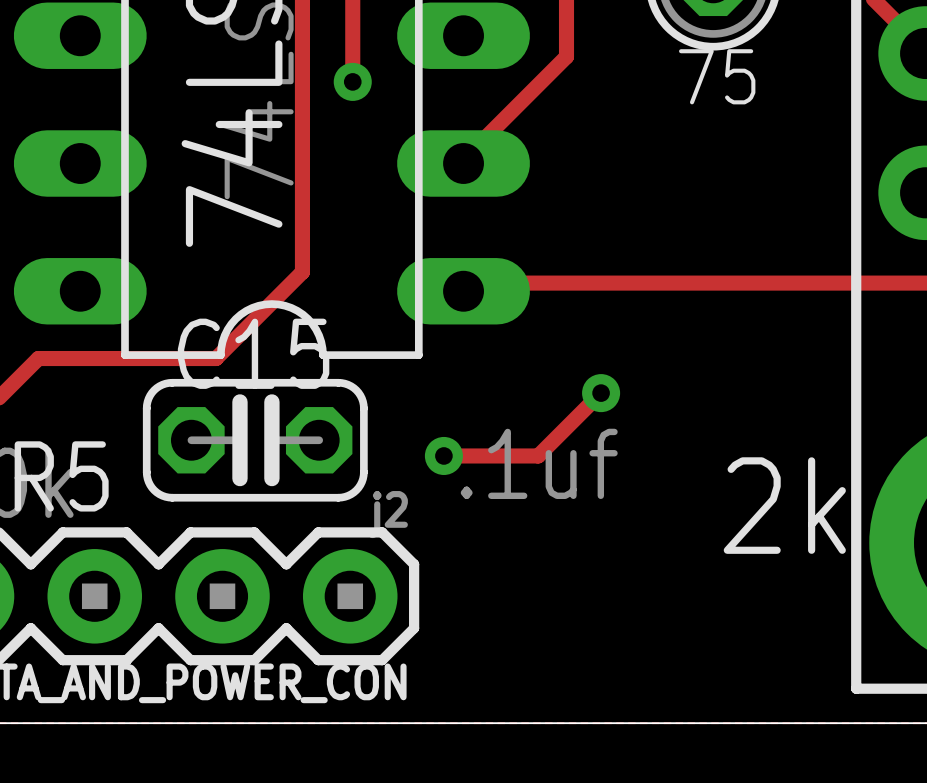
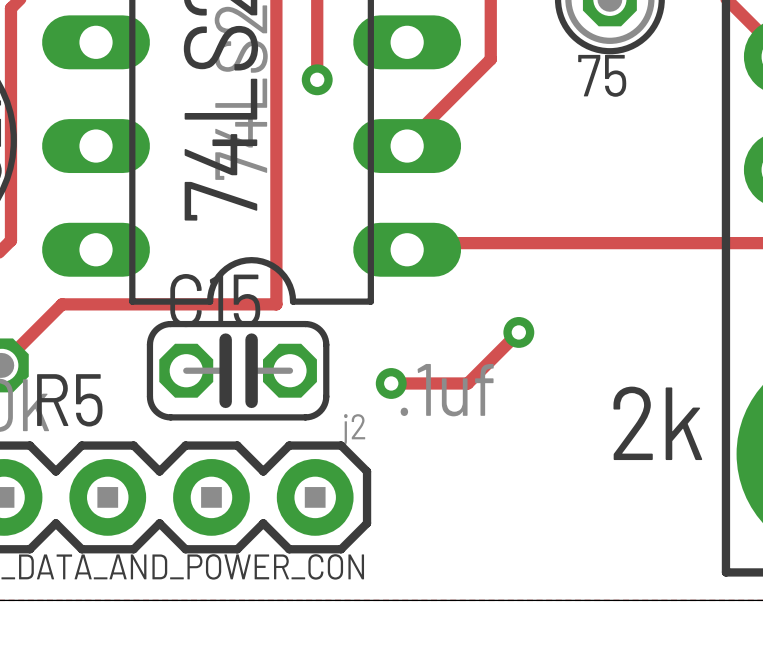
track: (302, 272) (216, 358) -> (276, 234) (276, 304) (206, 304)

